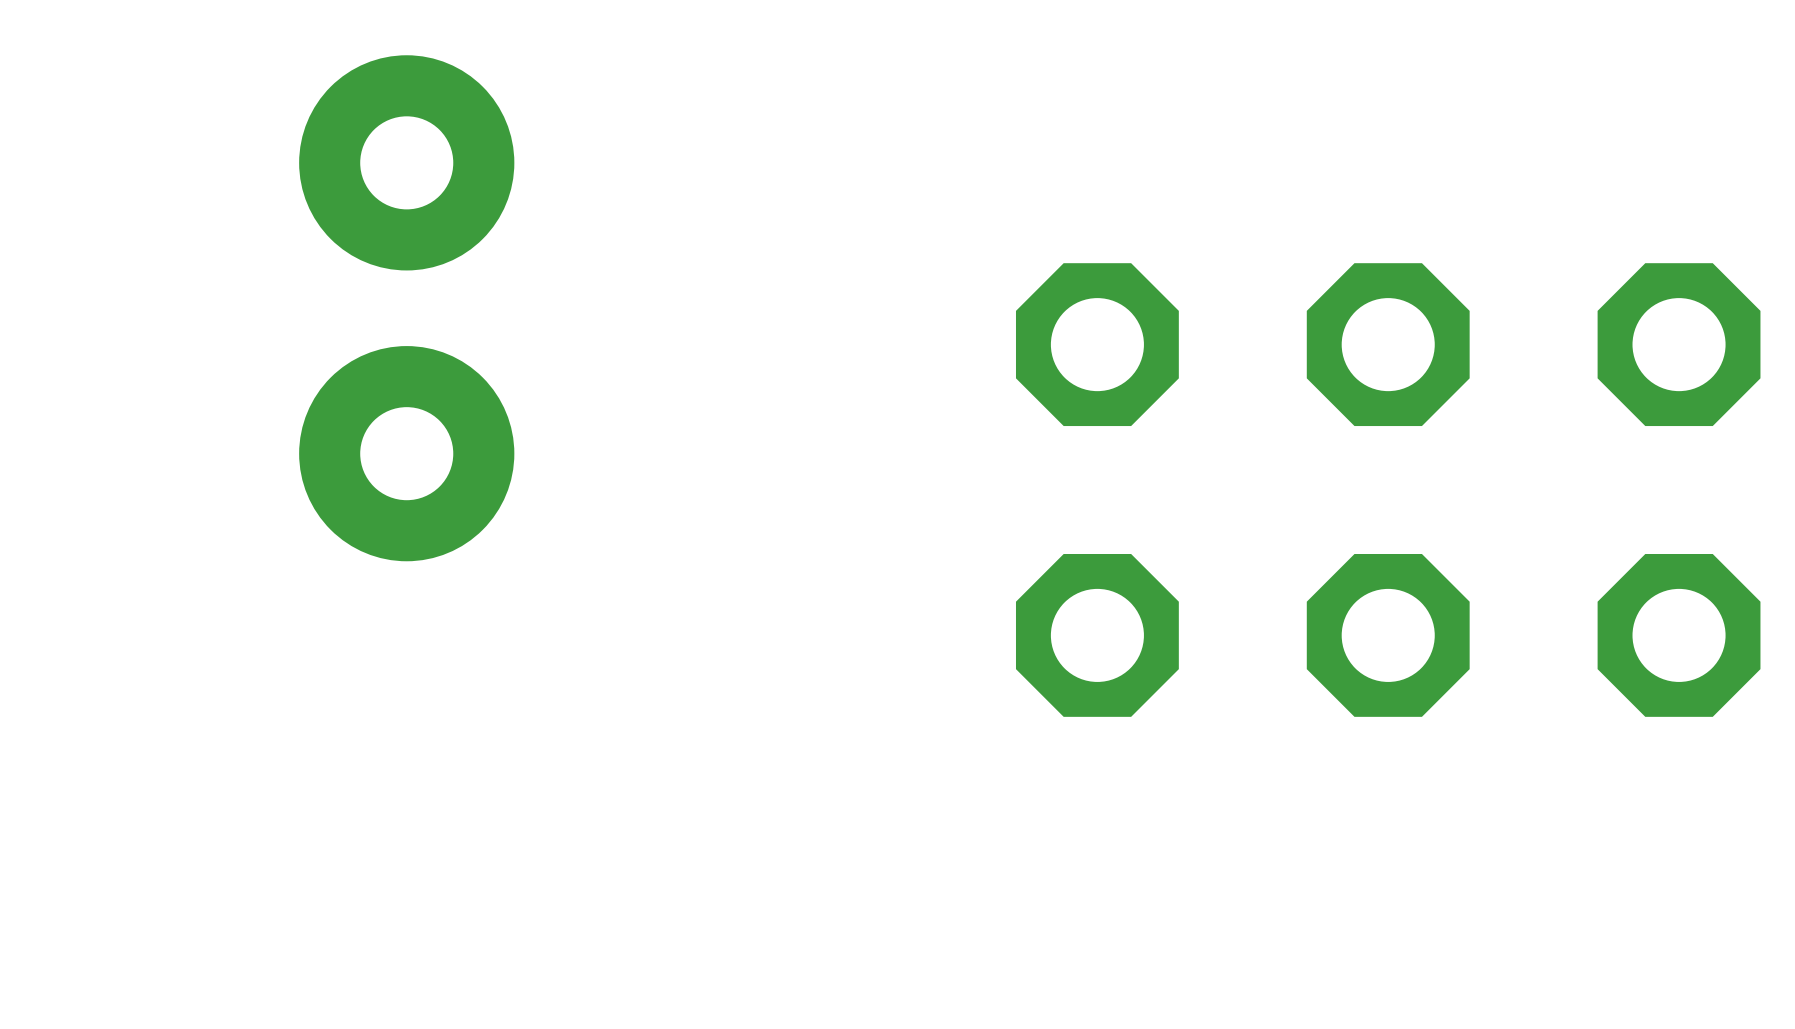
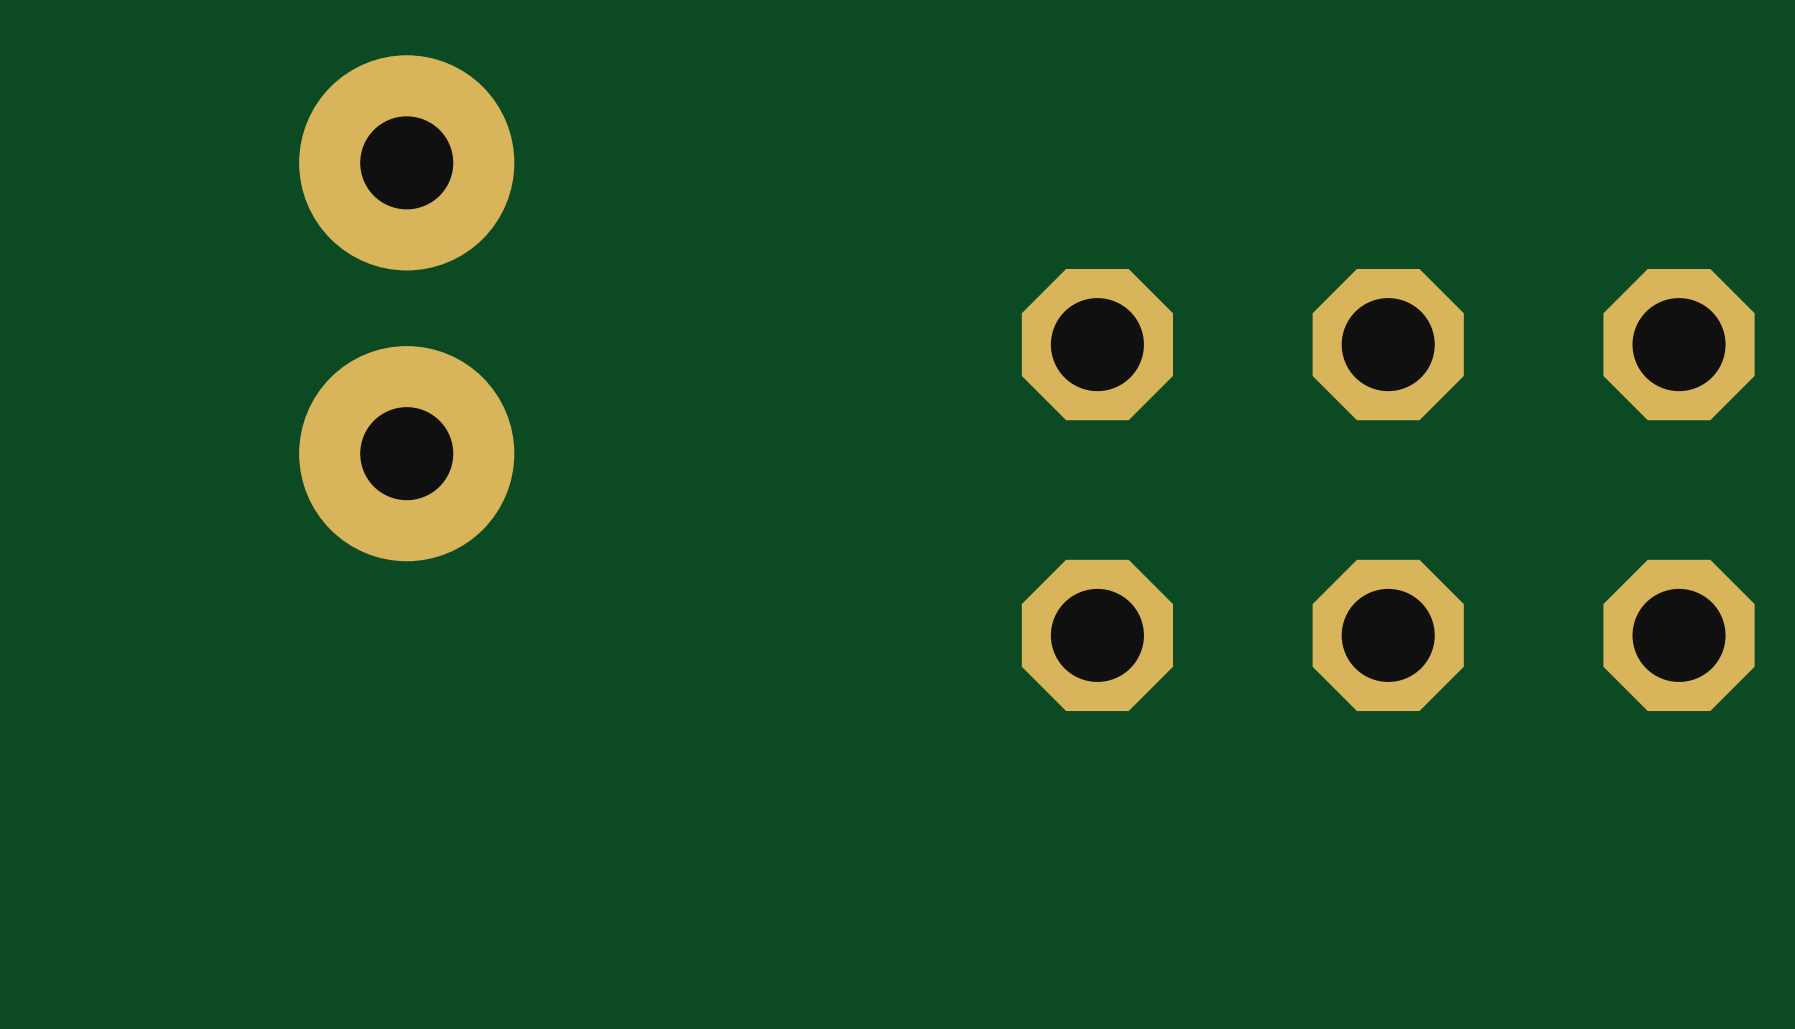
part footprint: [1015, 263, 1179, 717] -> [1021, 269, 1174, 712]
part footprint: [1306, 263, 1470, 717] -> [1312, 269, 1464, 712]
part footprint: [1597, 263, 1761, 717] -> [1603, 269, 1755, 712]

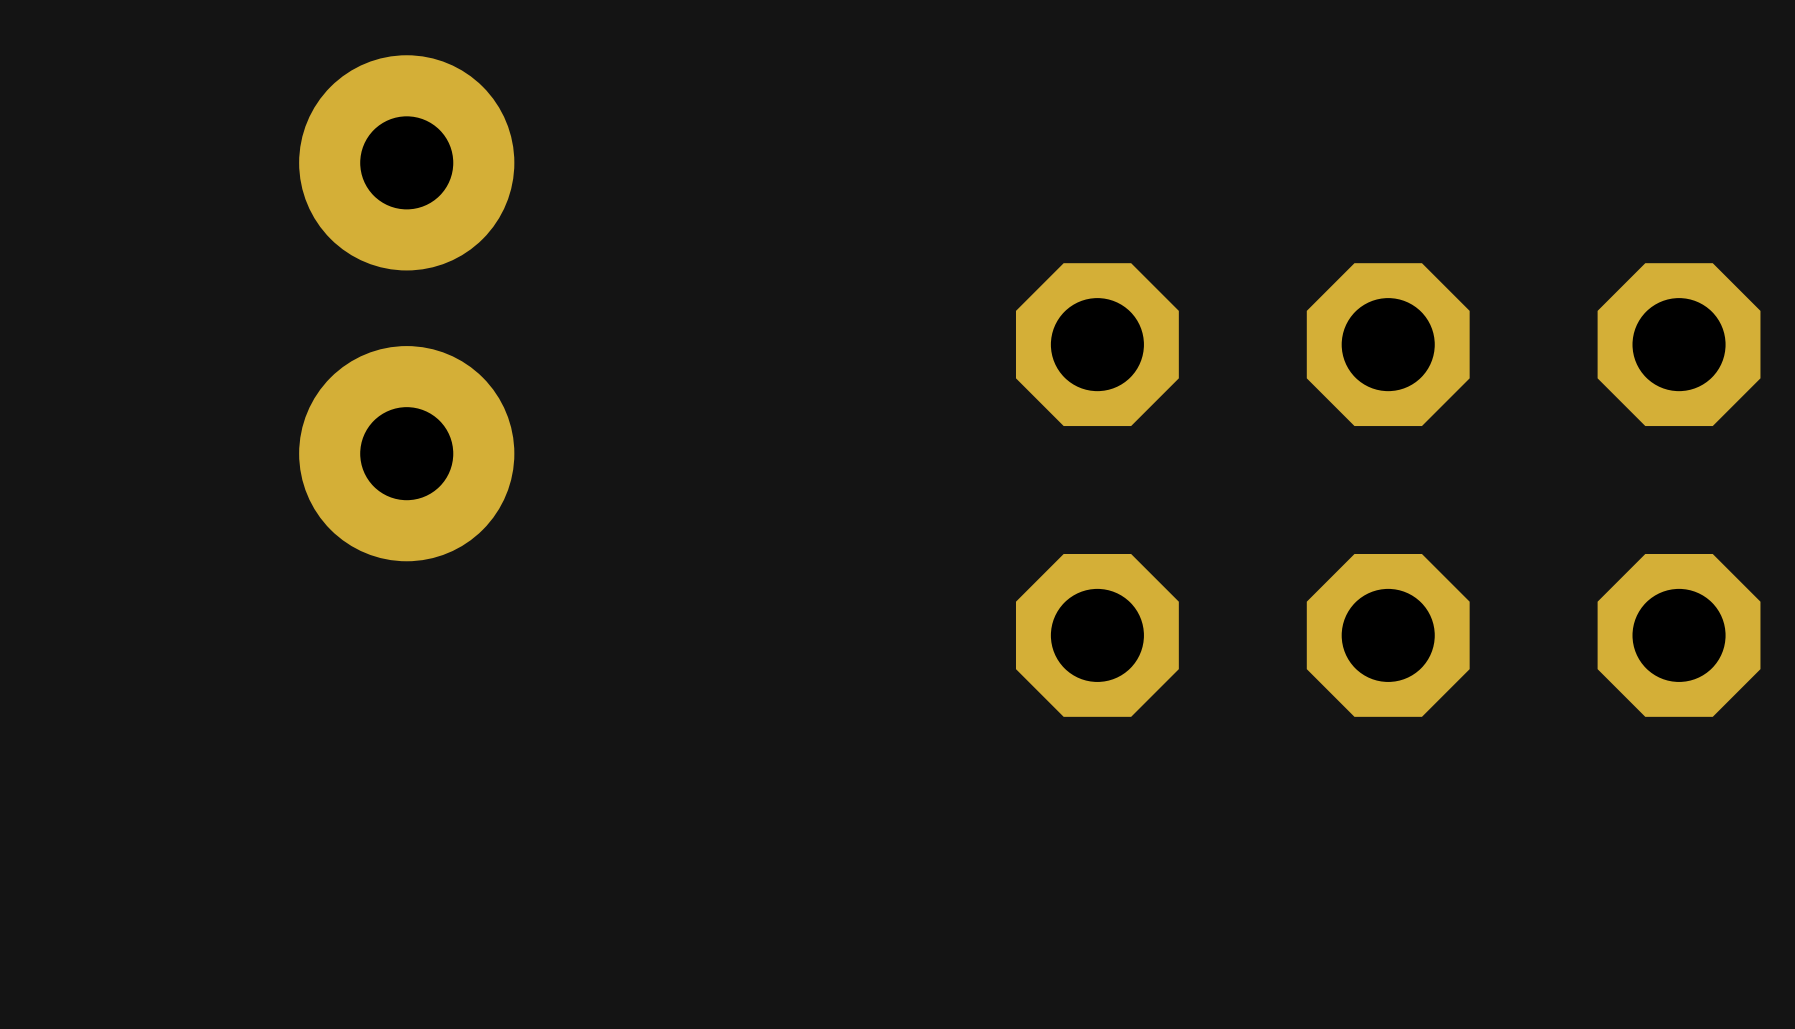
part footprint: [1021, 269, 1174, 712] -> [1015, 263, 1179, 717]
part footprint: [1312, 269, 1464, 712] -> [1306, 263, 1470, 717]
part footprint: [1603, 269, 1755, 712] -> [1597, 263, 1761, 717]

